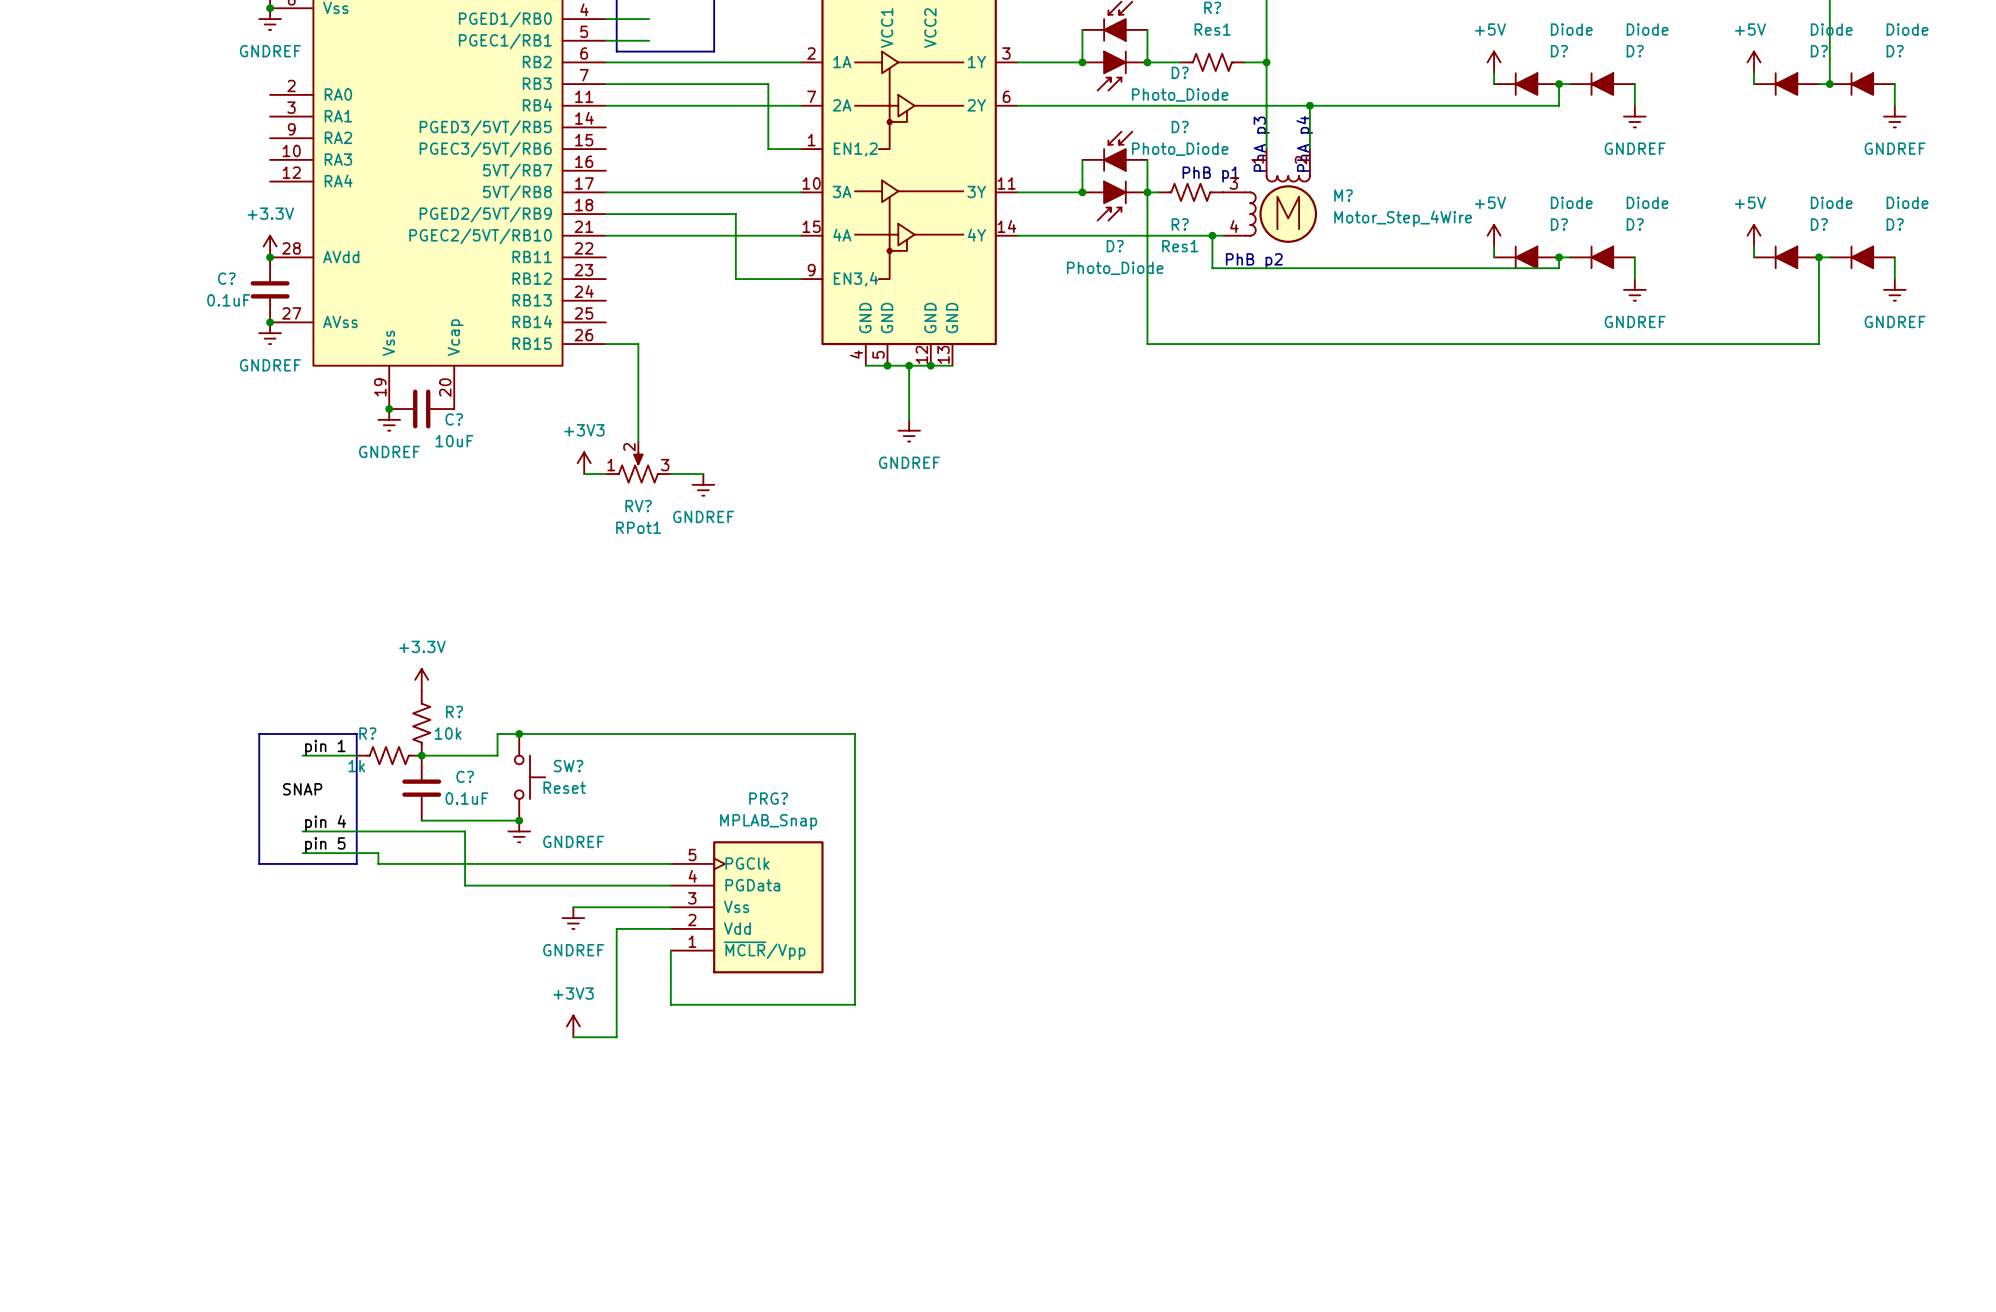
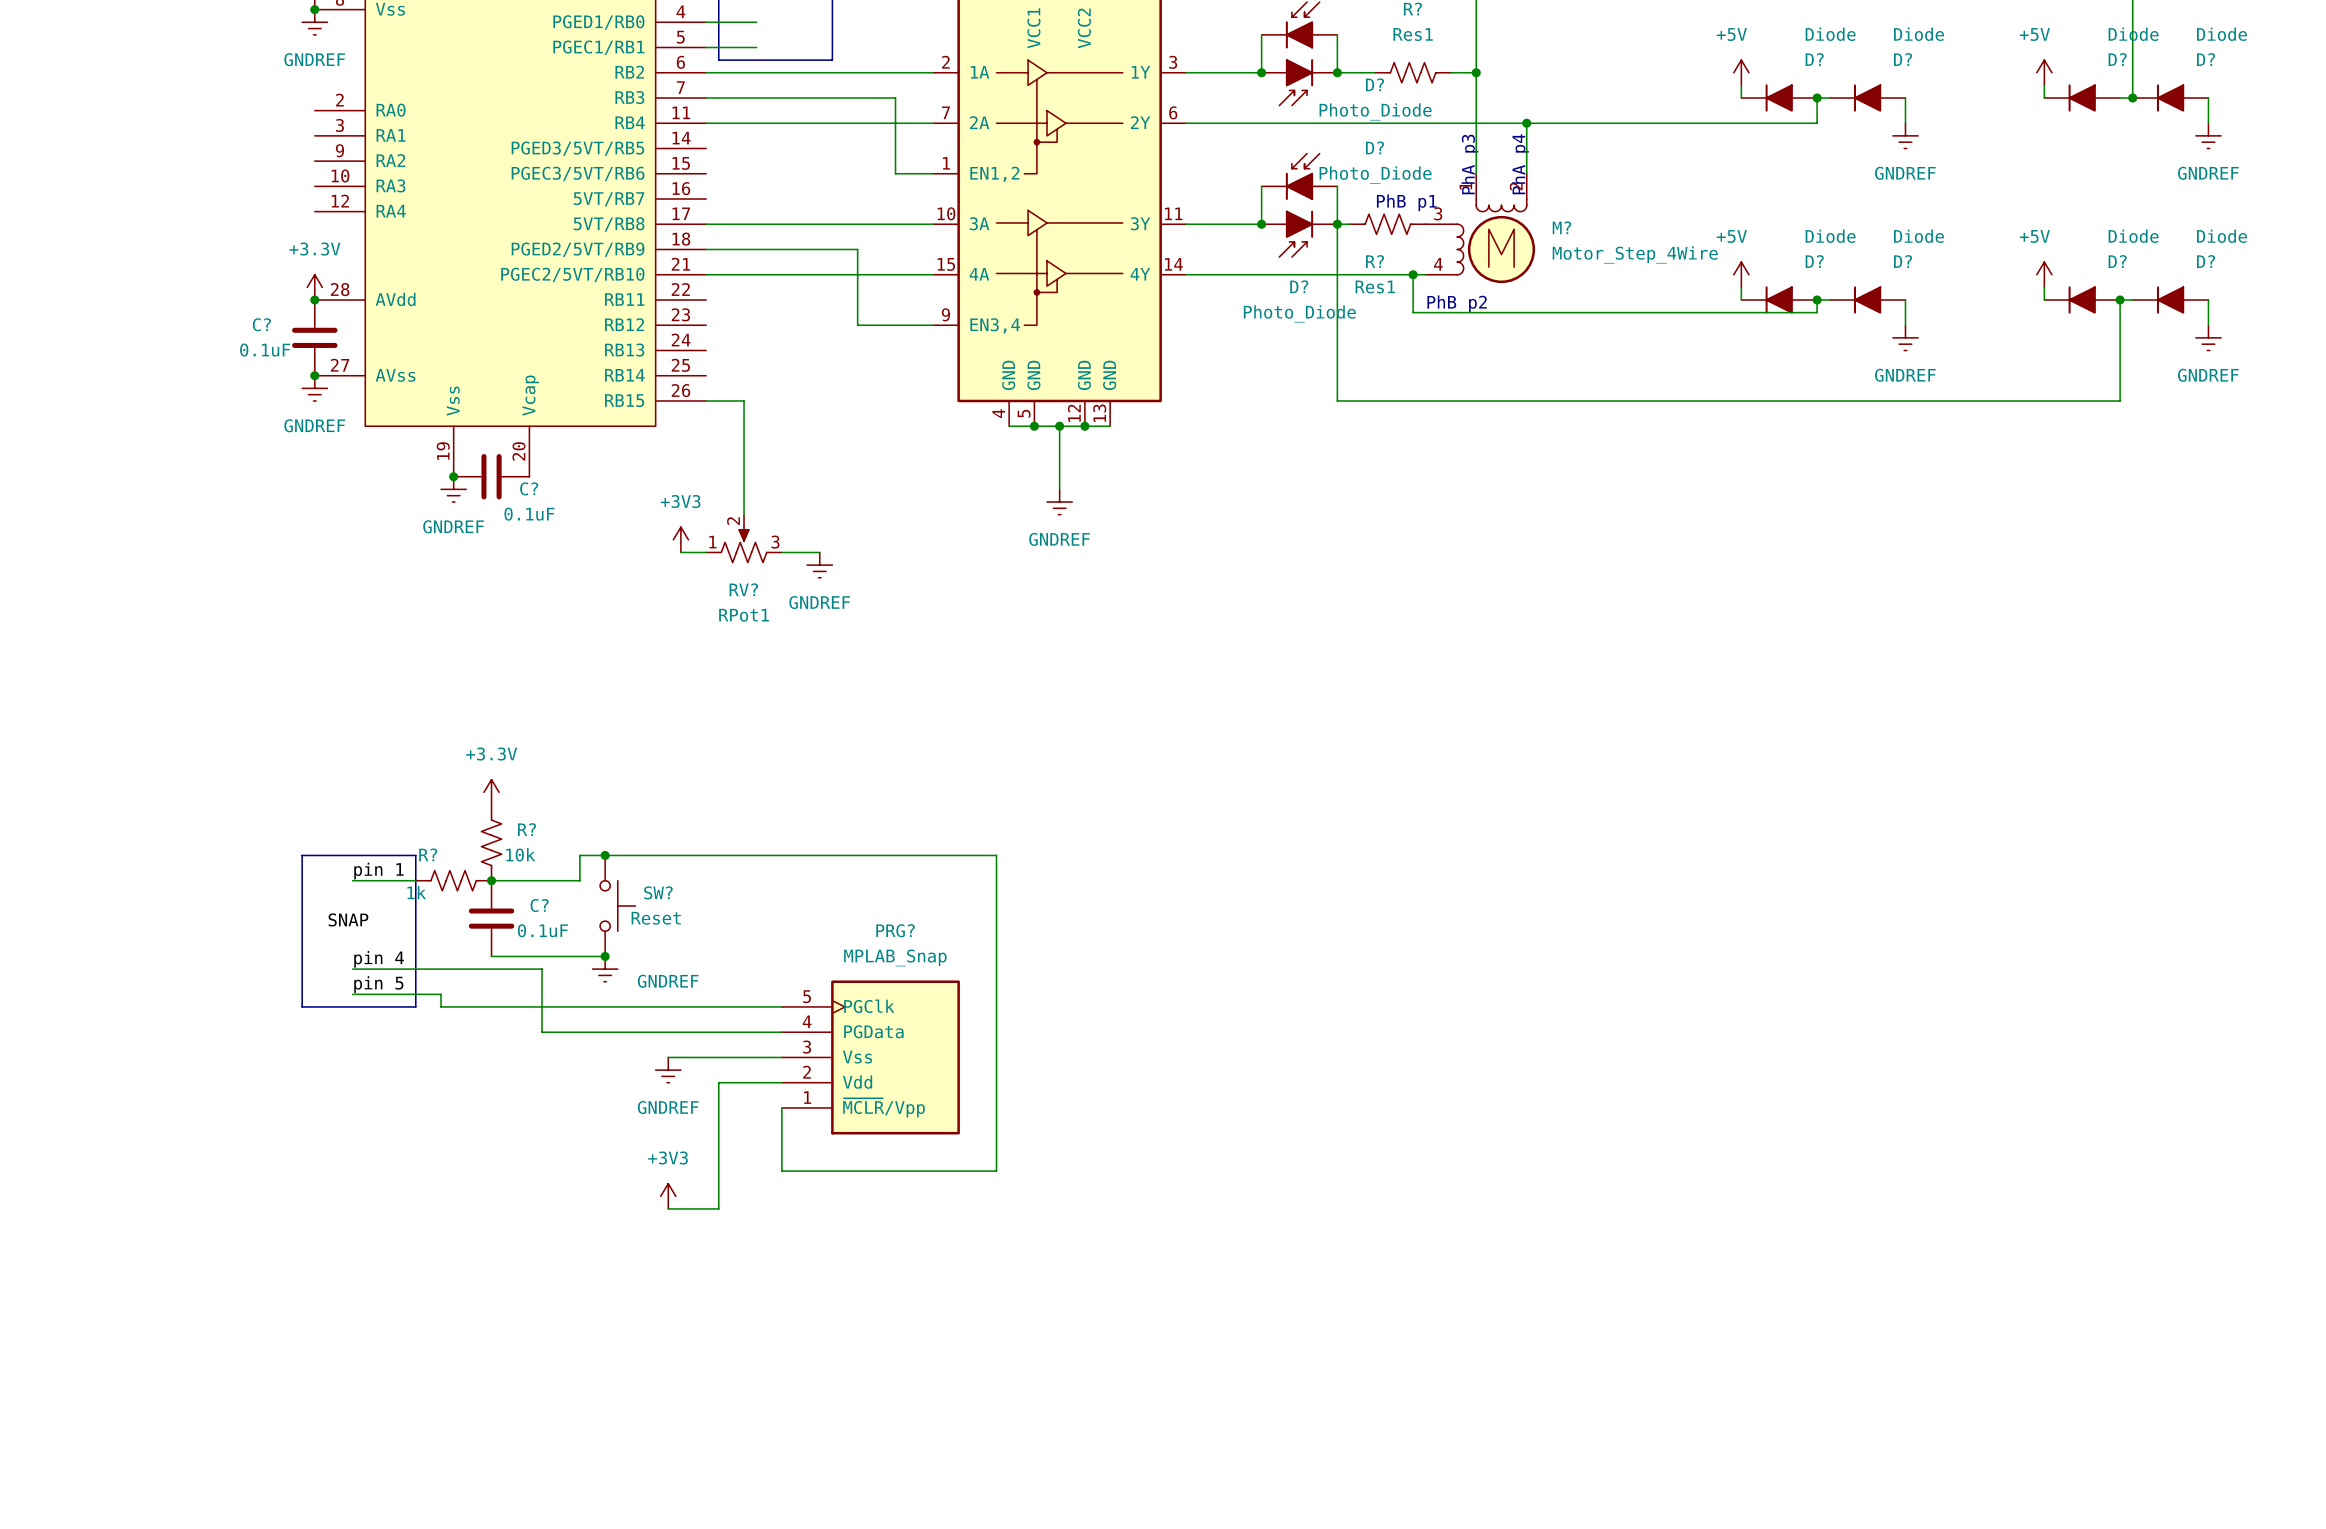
C? value: 10uF (454, 441) -> 0.1uF (529, 514)

